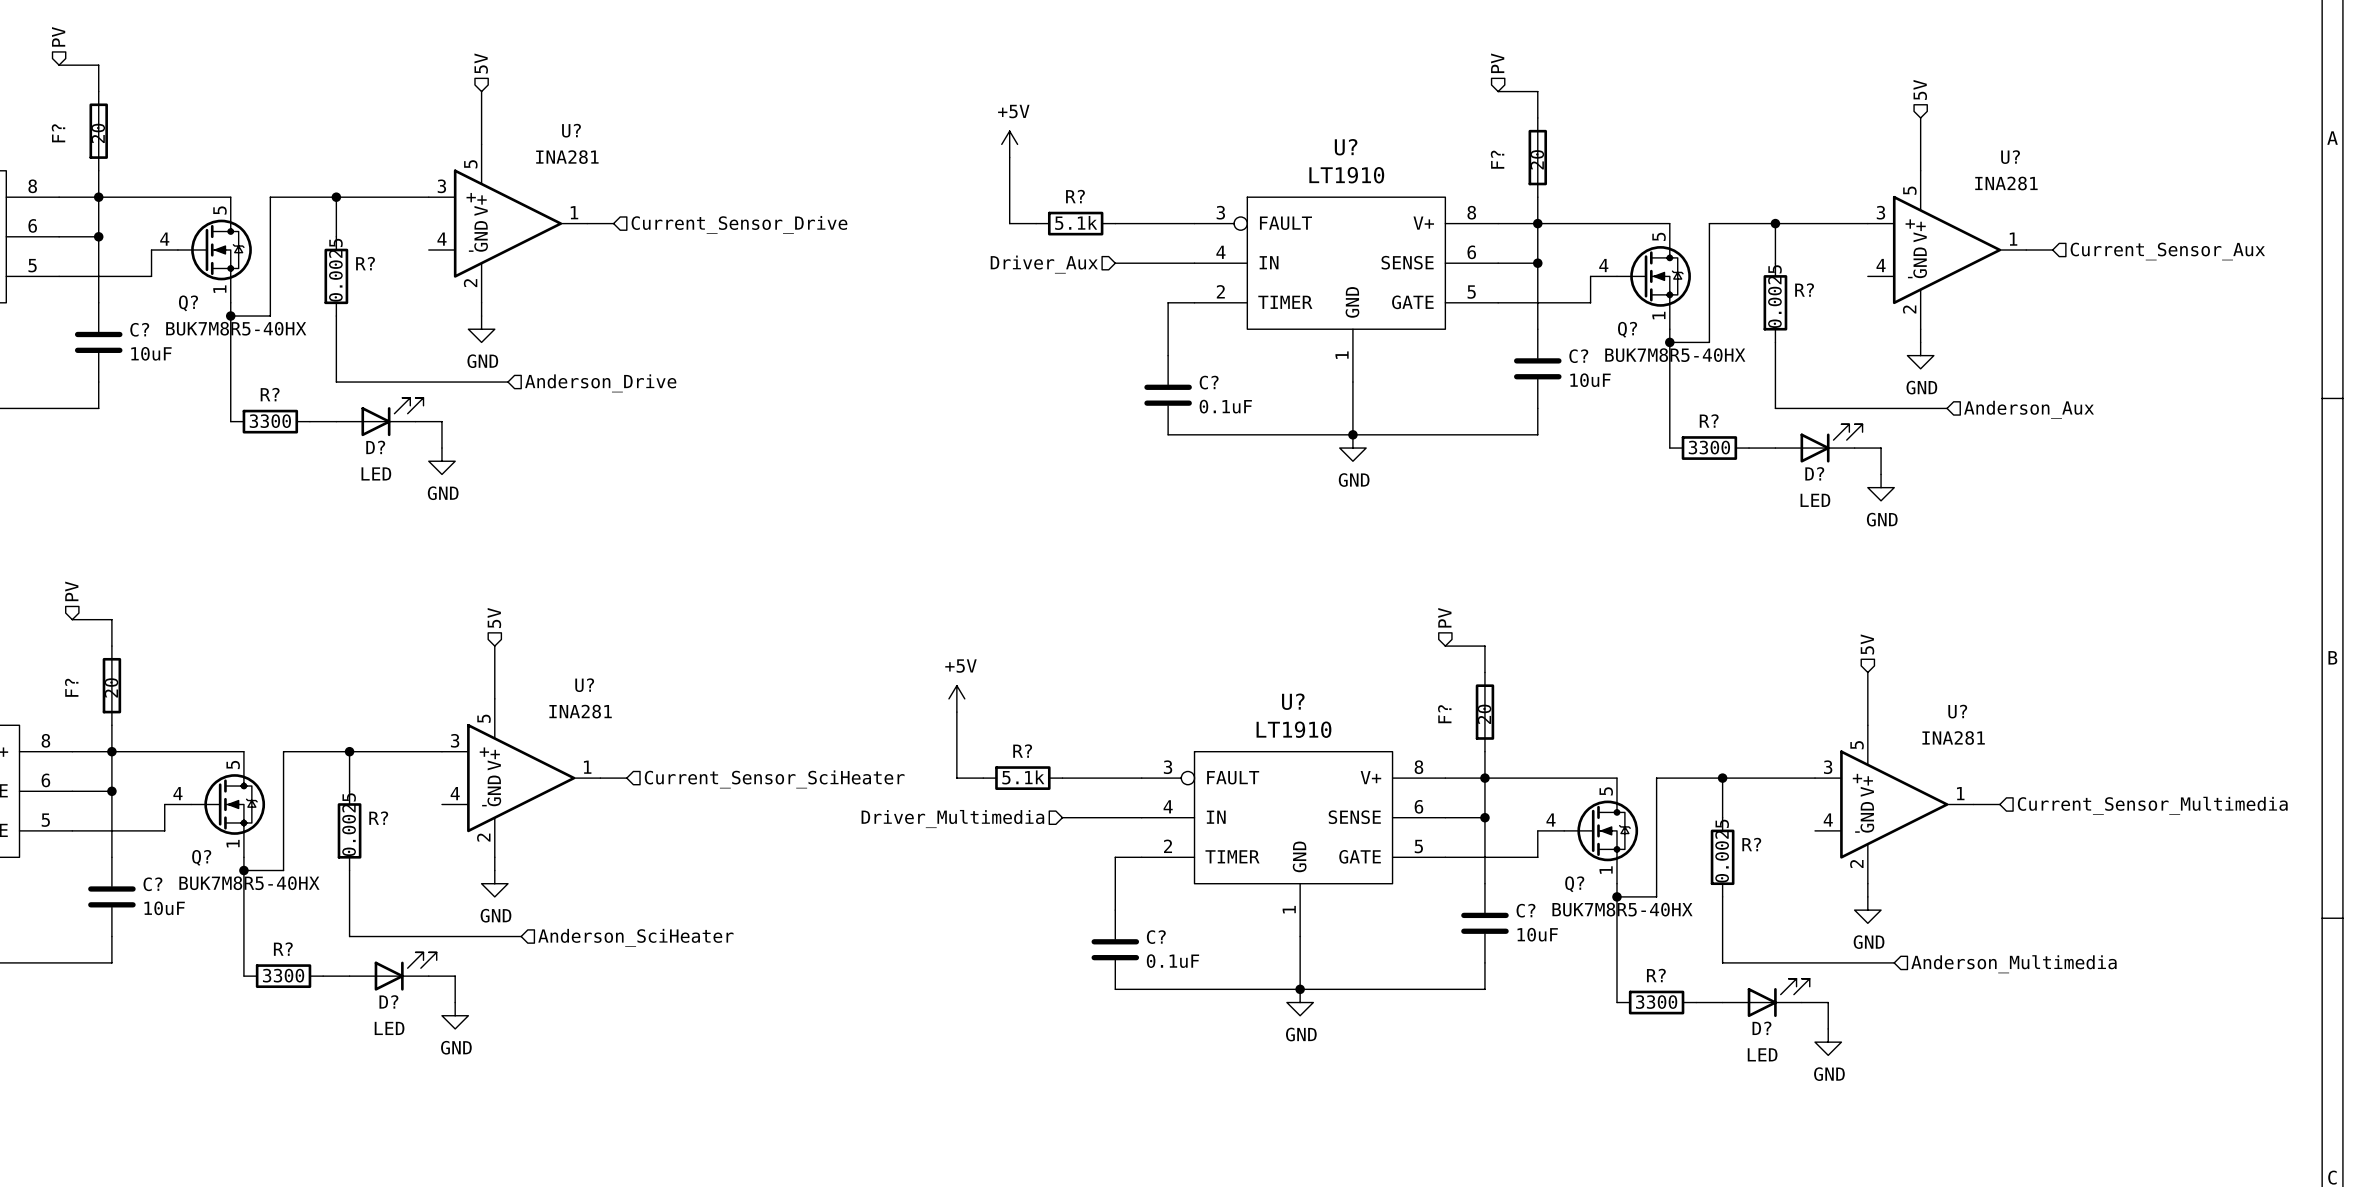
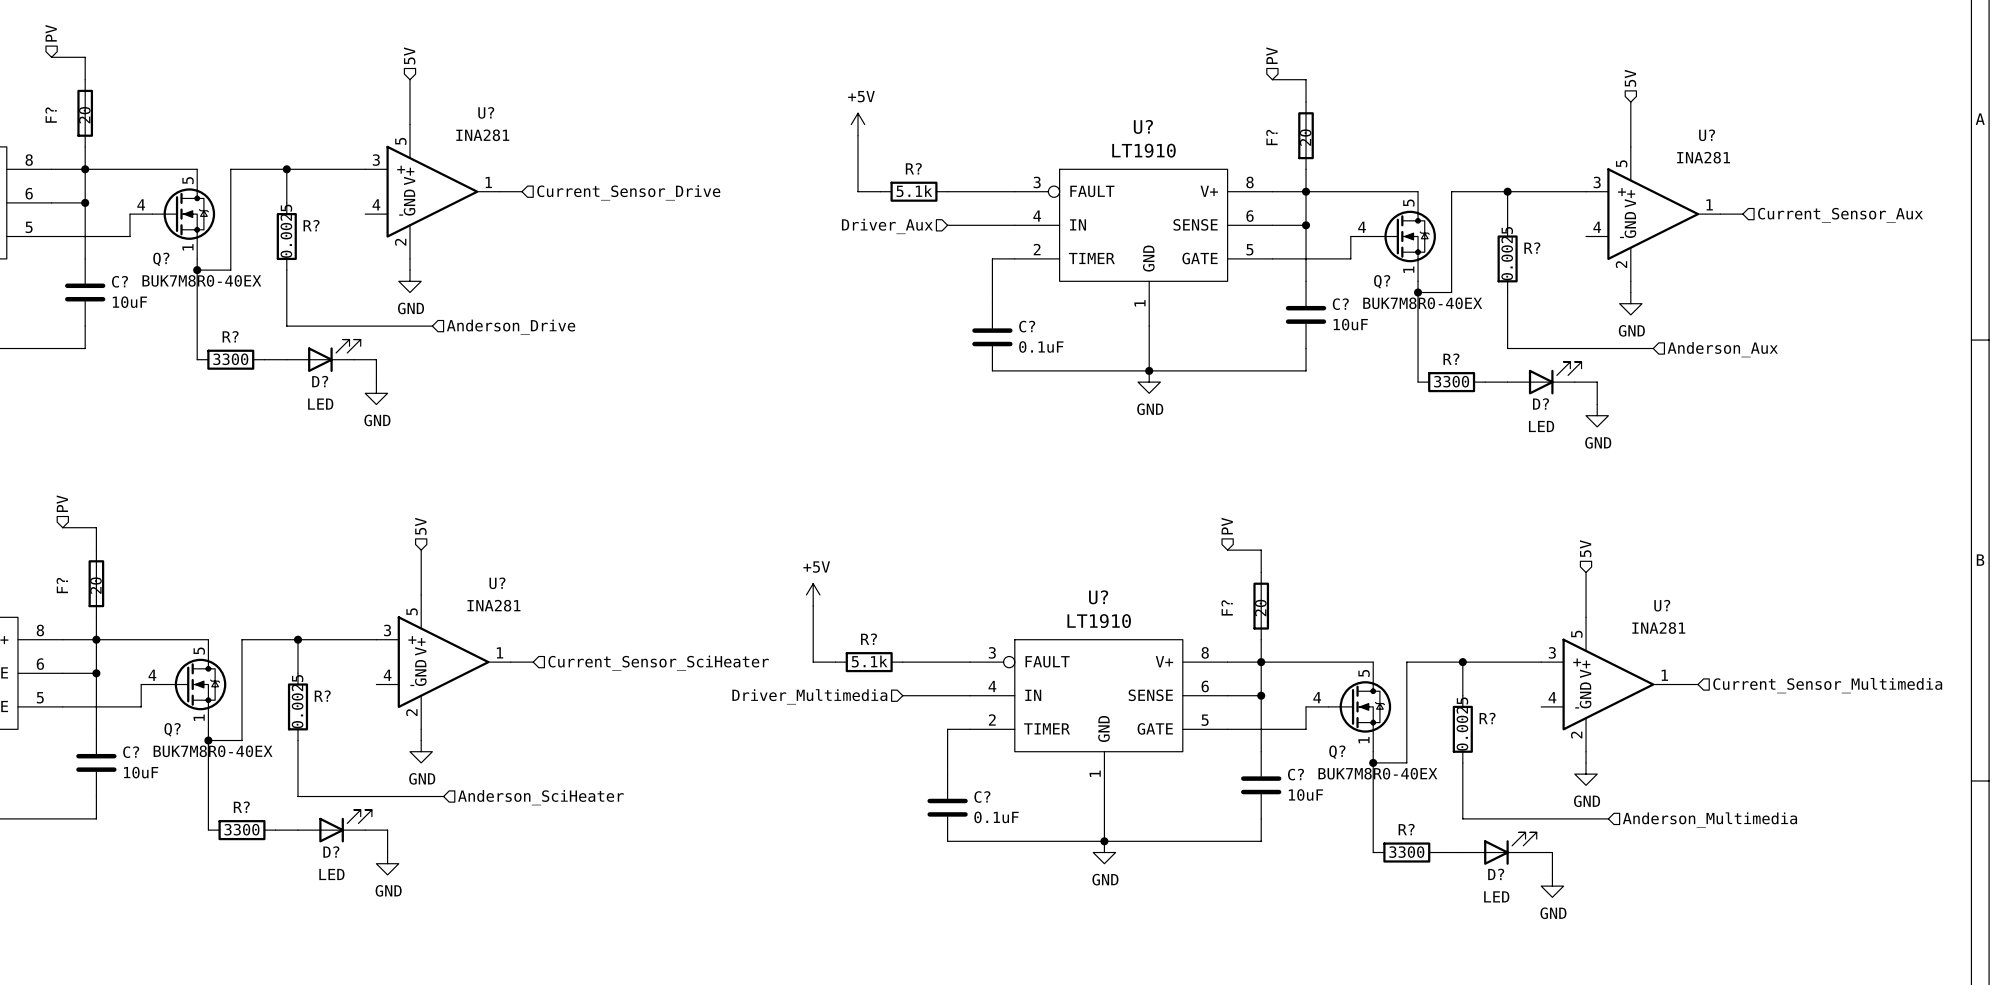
Q? value: BUK7M8R5-40HX (236, 328) -> BUK7M8R0-40EX (201, 280)
Q? value: BUK7M8R5-40HX (1675, 355) -> BUK7M8R0-40EX (1422, 303)
Q? value: BUK7M8R5-40HX (249, 883) -> BUK7M8R0-40EX (213, 751)
Q? value: BUK7M8R5-40HX (1622, 909) -> BUK7M8R0-40EX (1377, 773)

